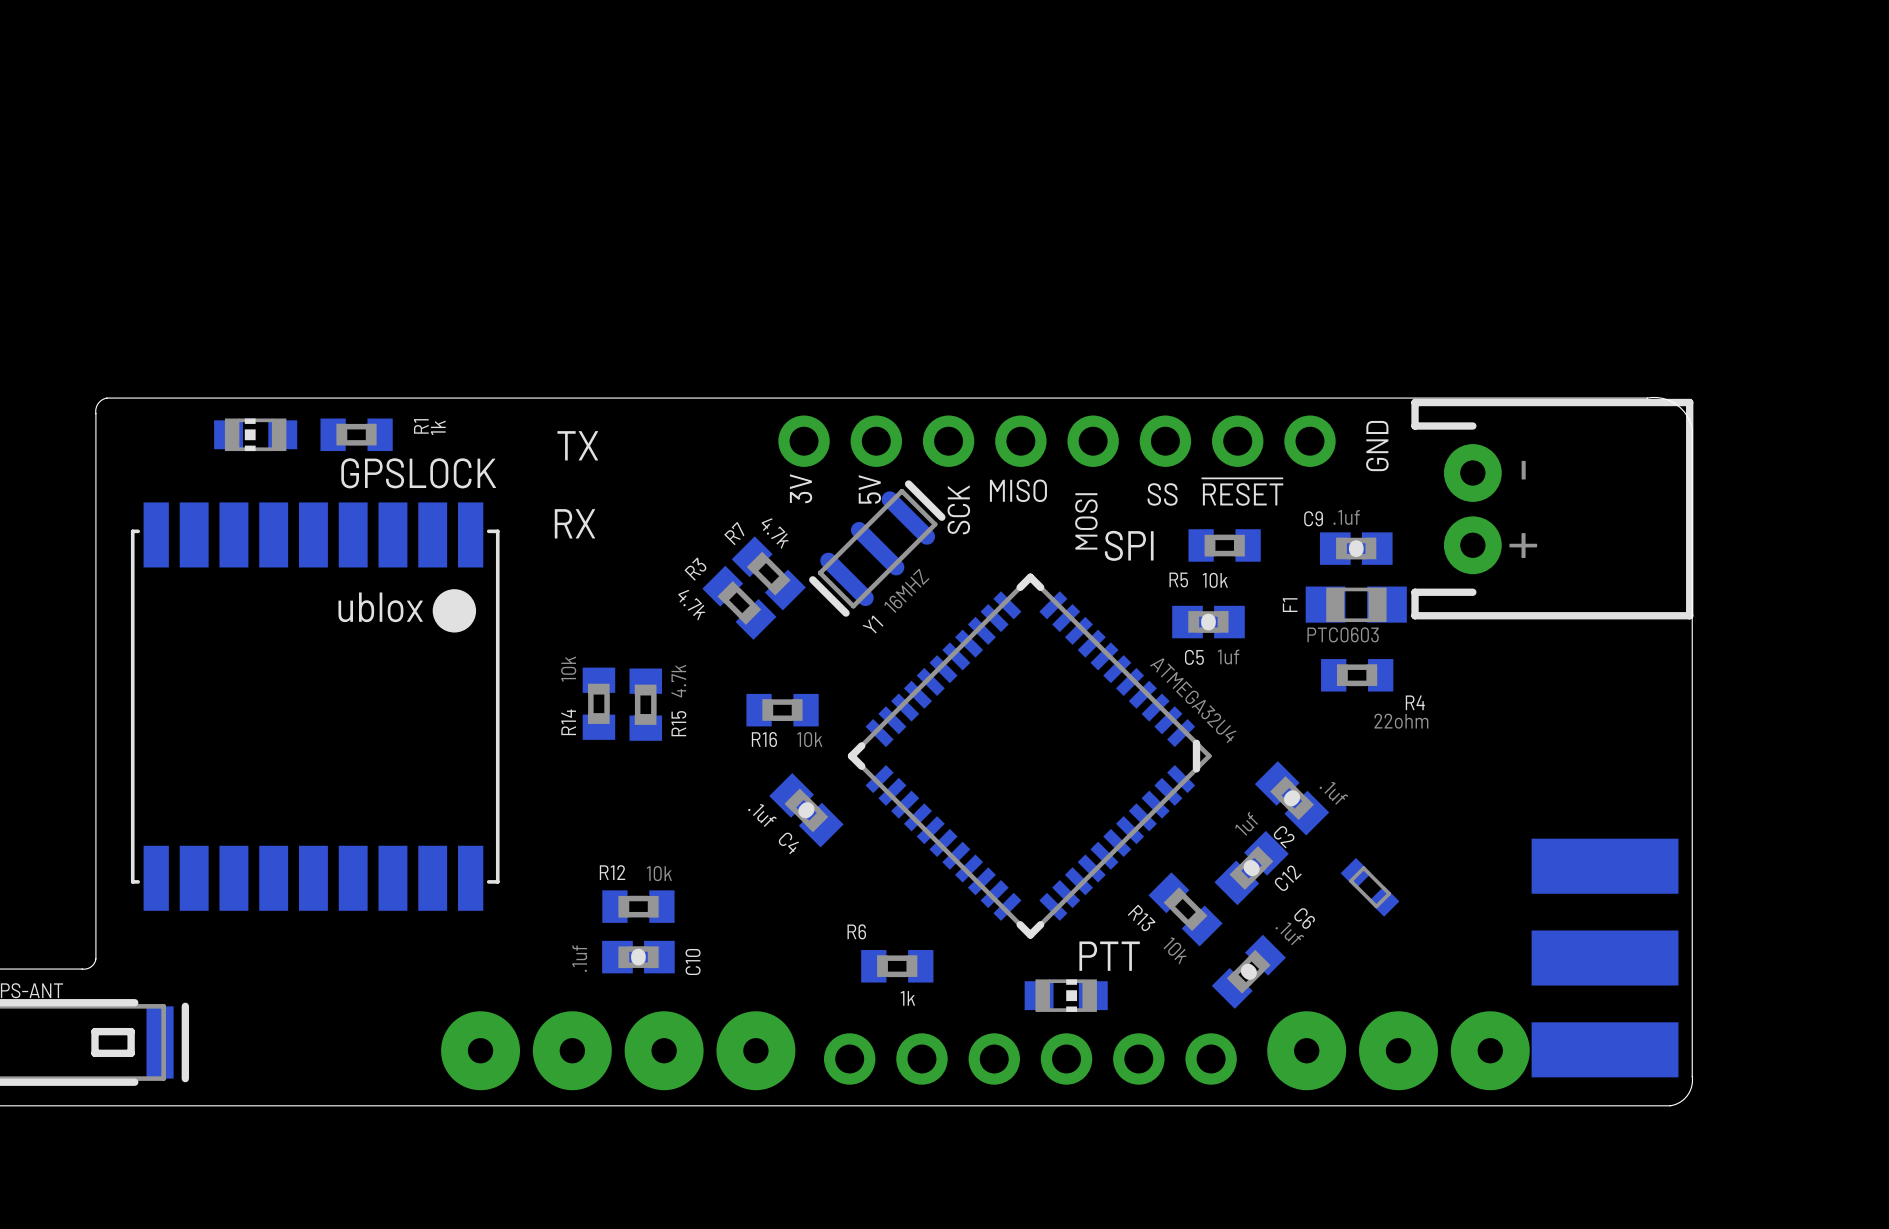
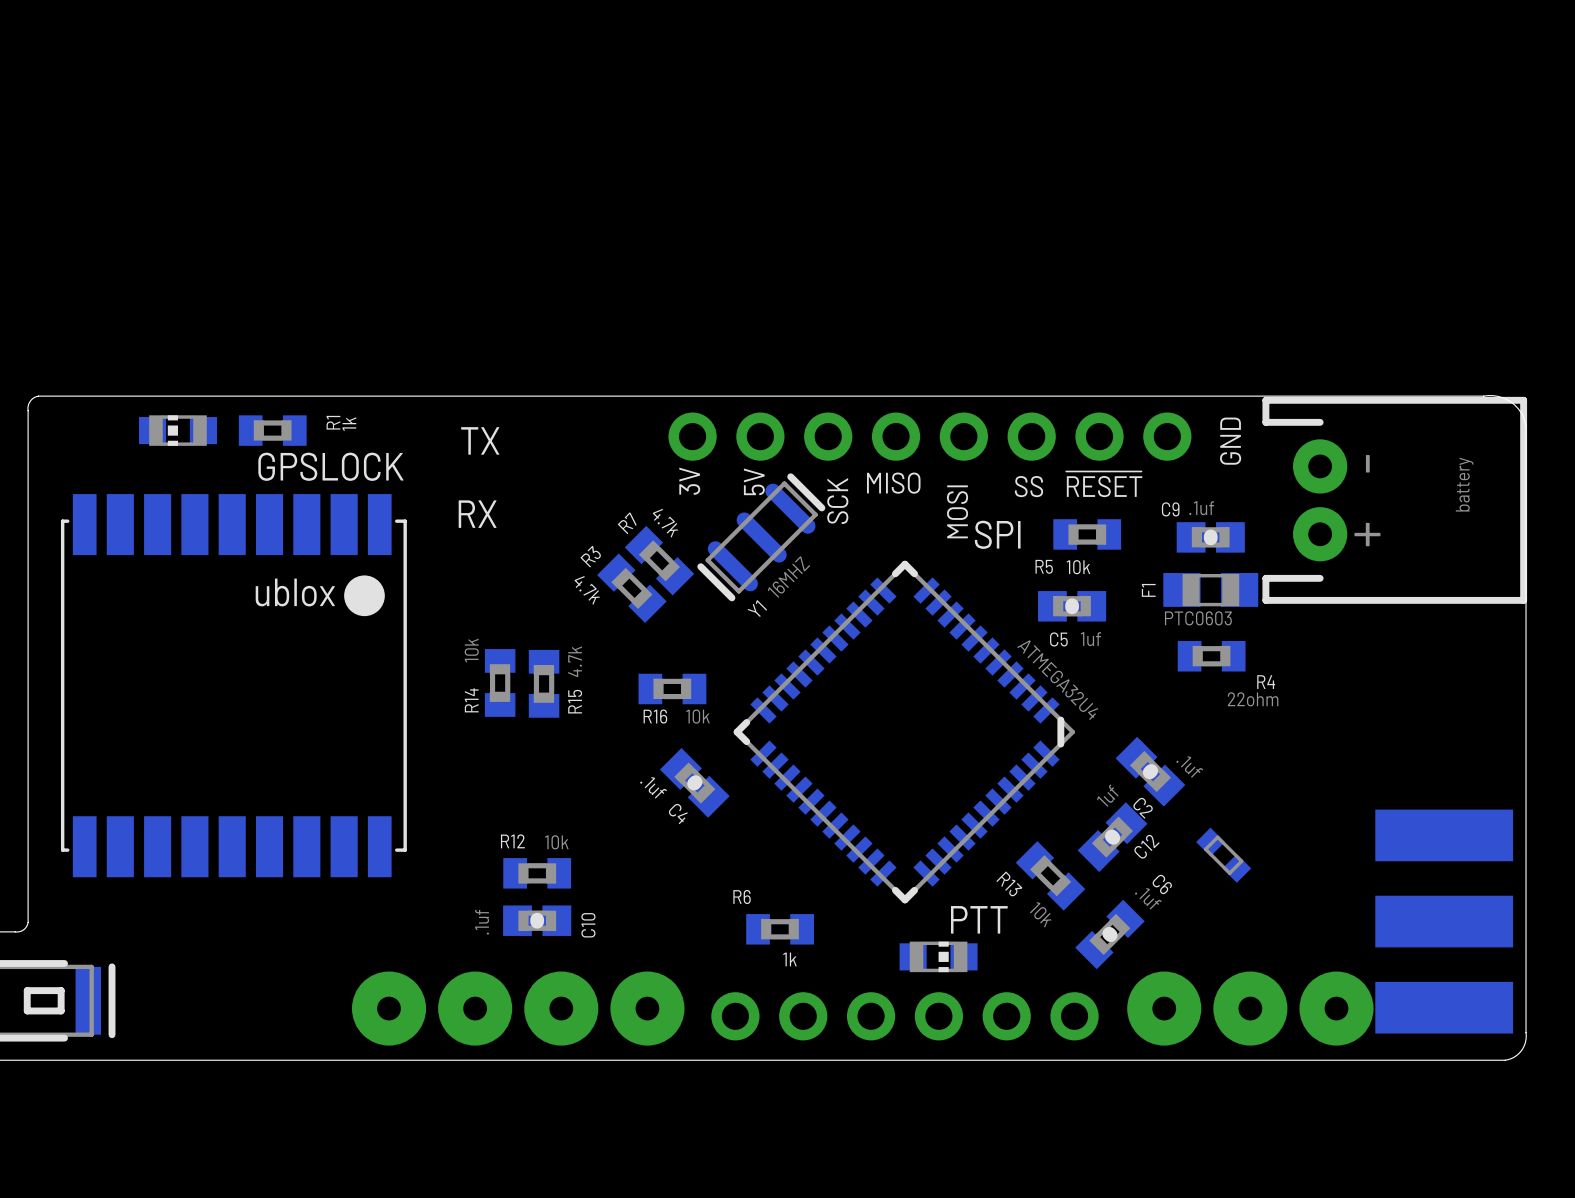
part value: none -> battery (1464, 484)

